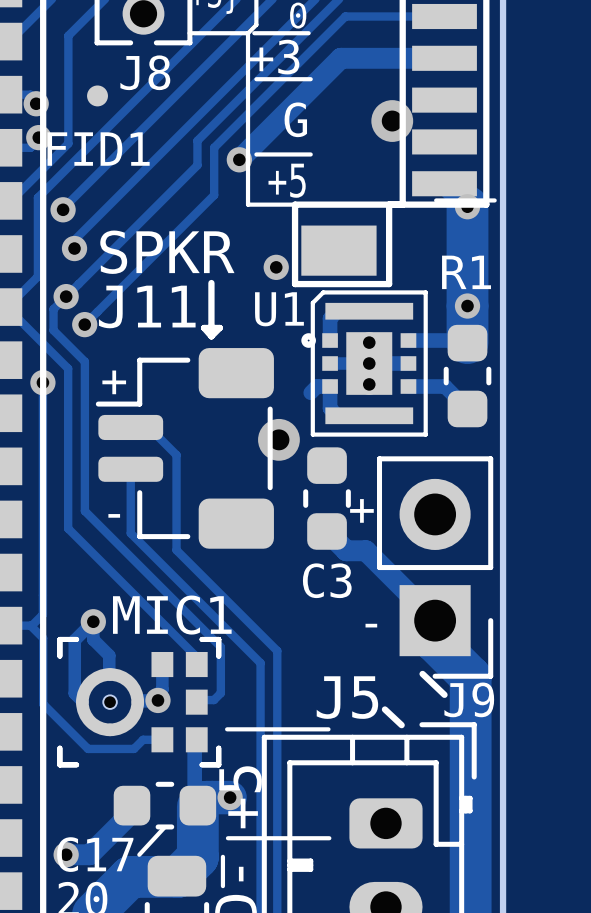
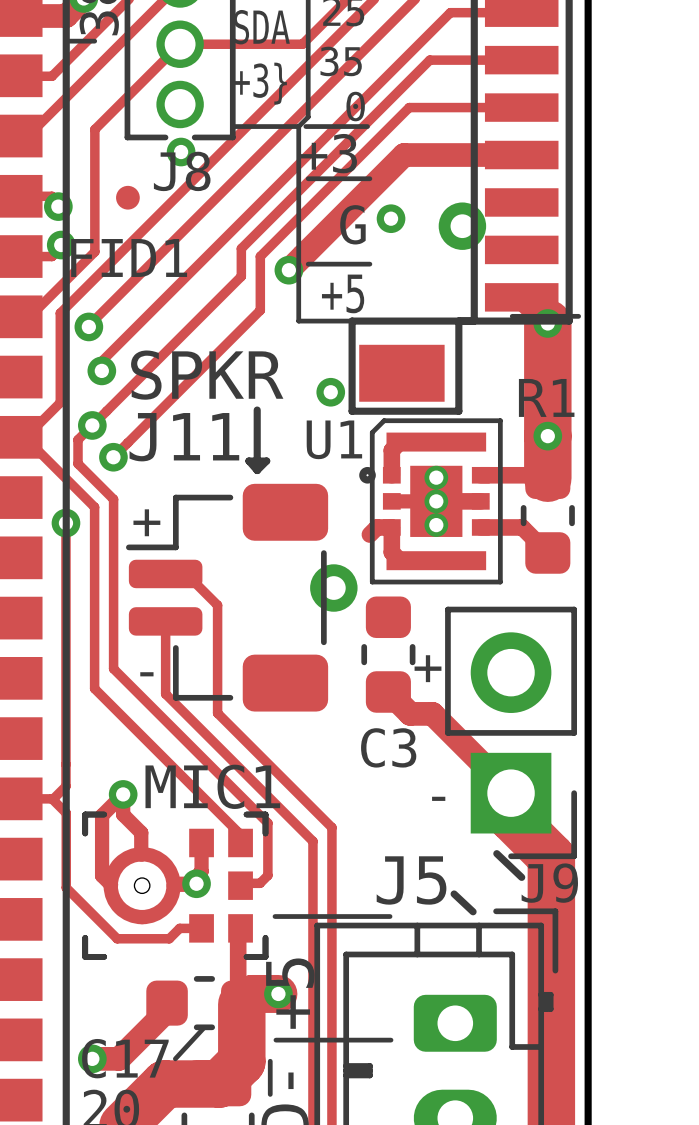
via: none -> (181, 152)
via: none -> (391, 218)

